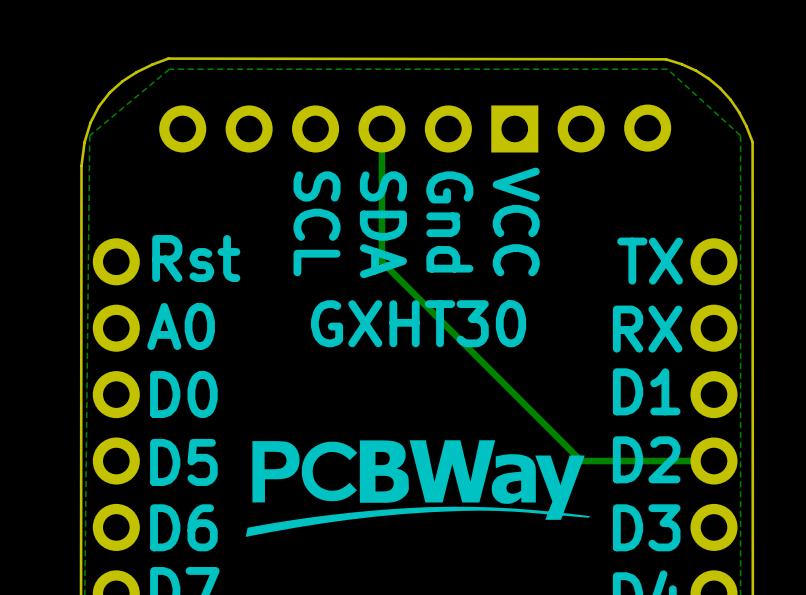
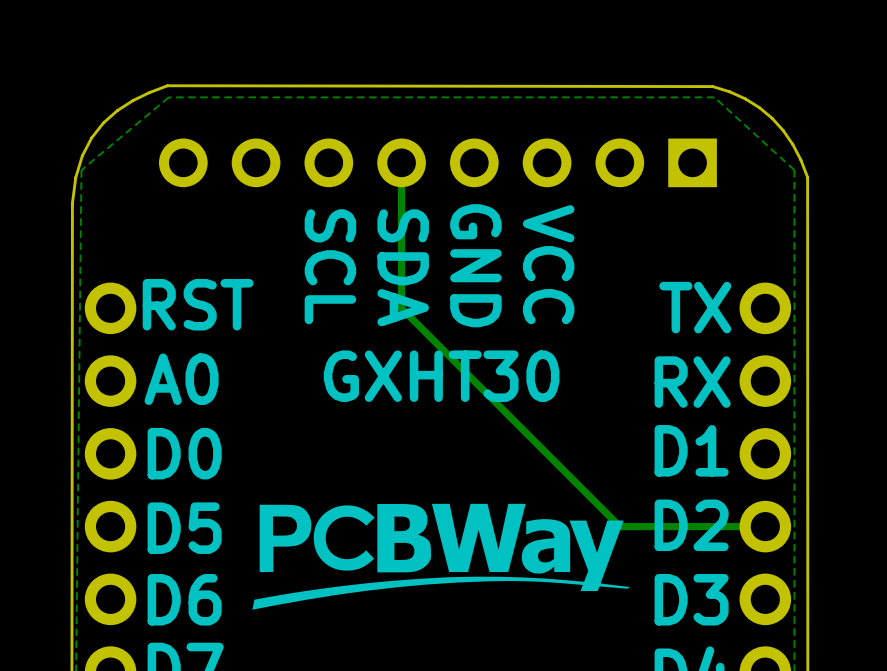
part: (182, 128) -> none
part: (249, 128) -> none
part: (315, 128) -> none
part: (381, 128) -> none
part: none -> (437, 162)
part: (448, 128) -> none
part: (514, 128) -> none
part: (581, 128) -> none
part: (647, 128) -> none
text: Gnd (449, 221) -> GND (475, 265)
text: Rst (196, 258) -> RST (198, 304)

